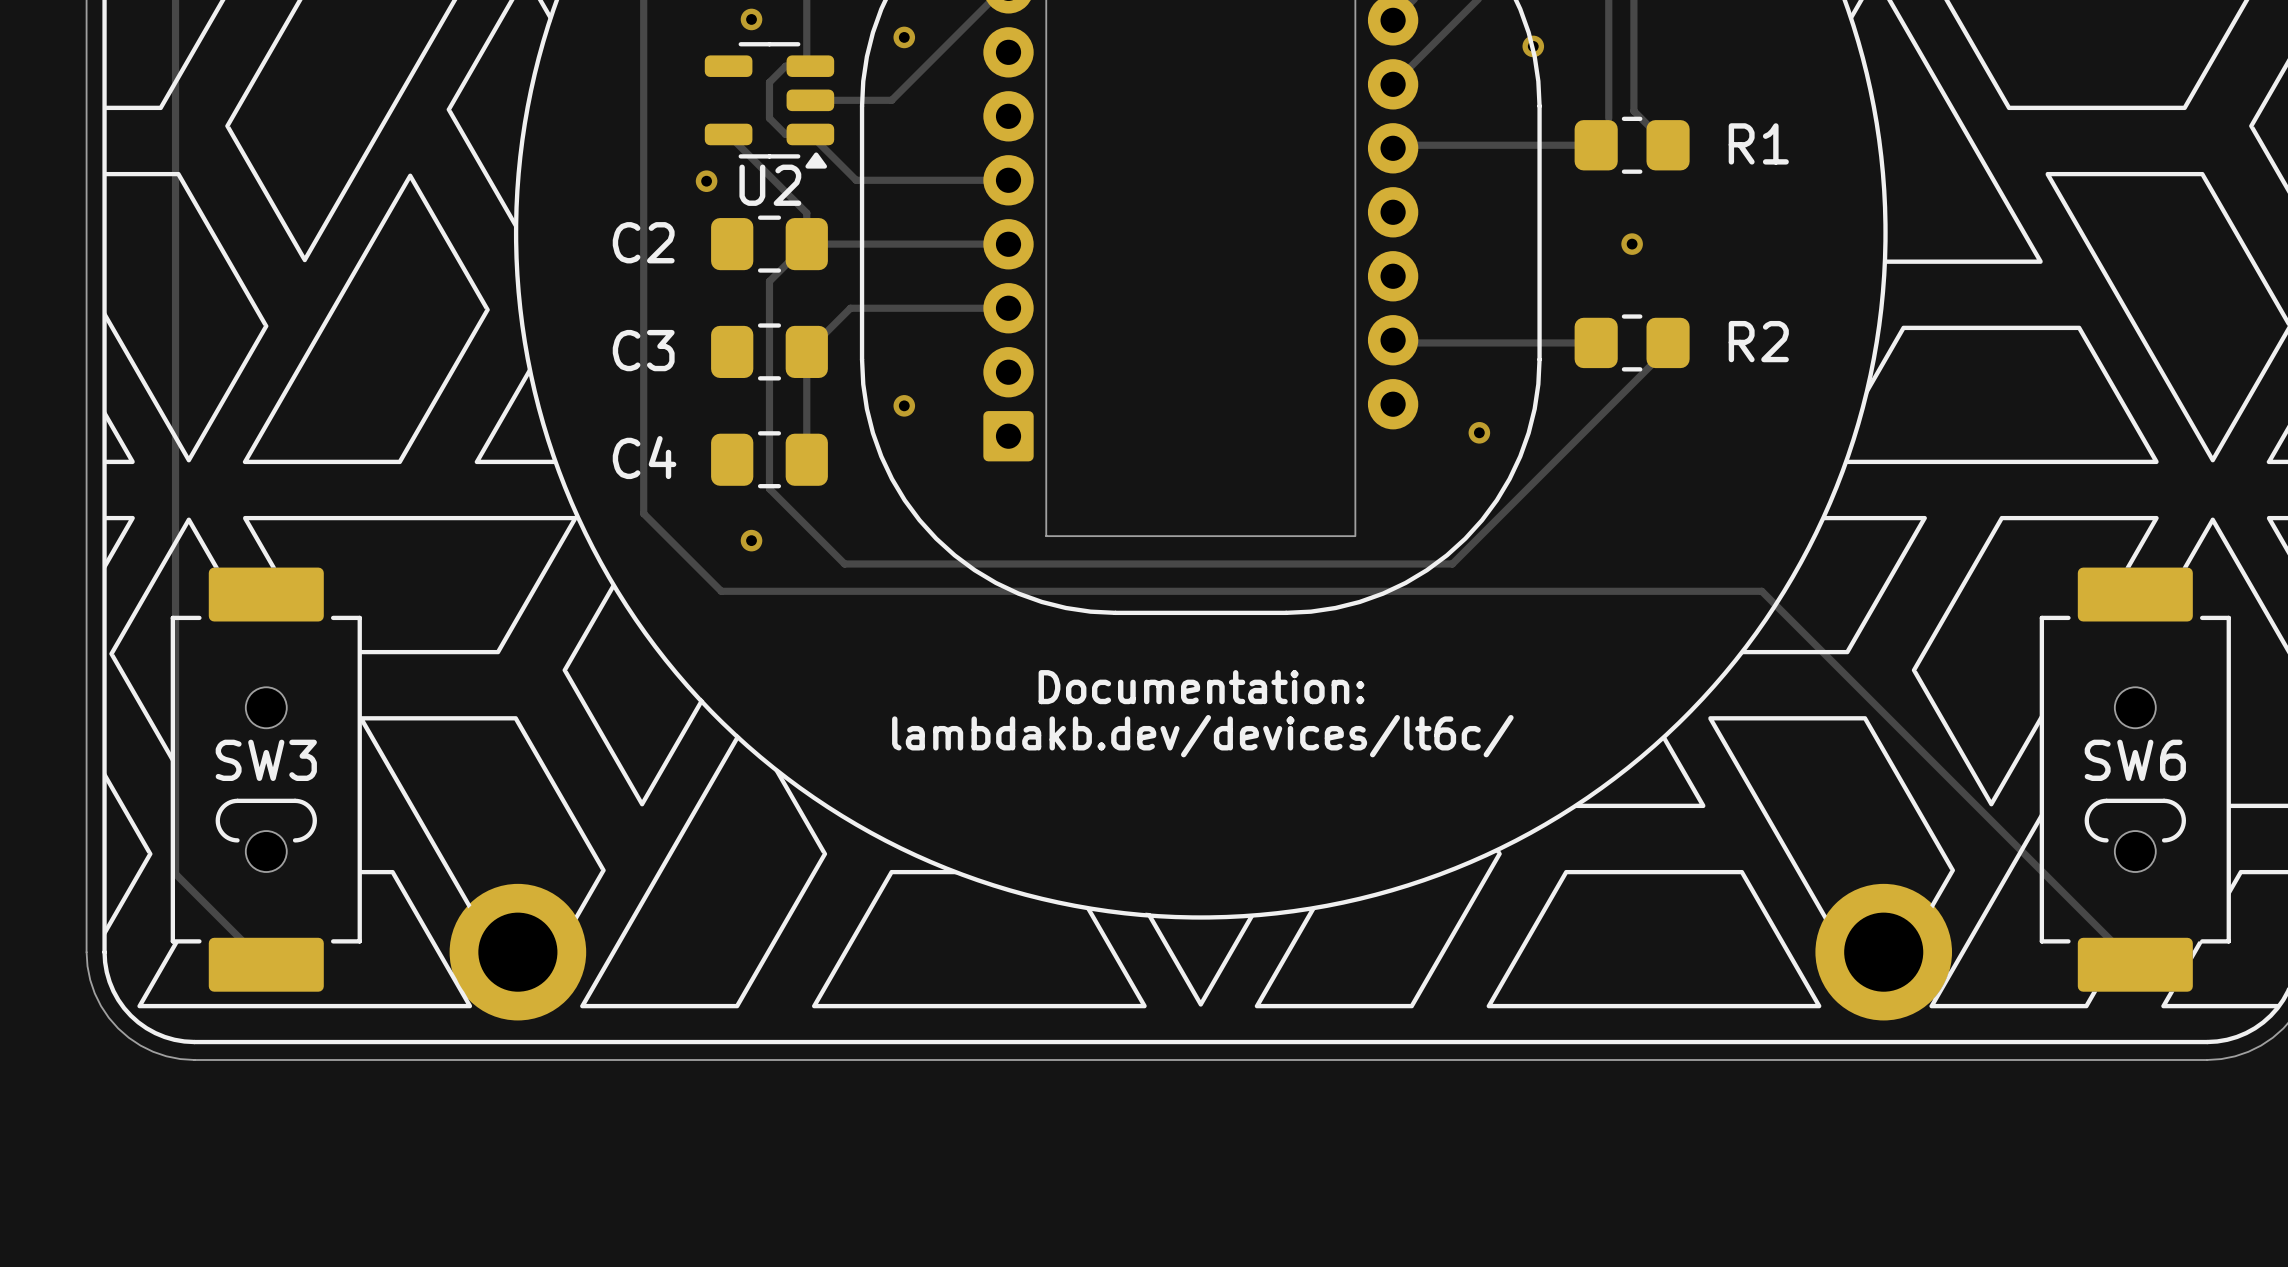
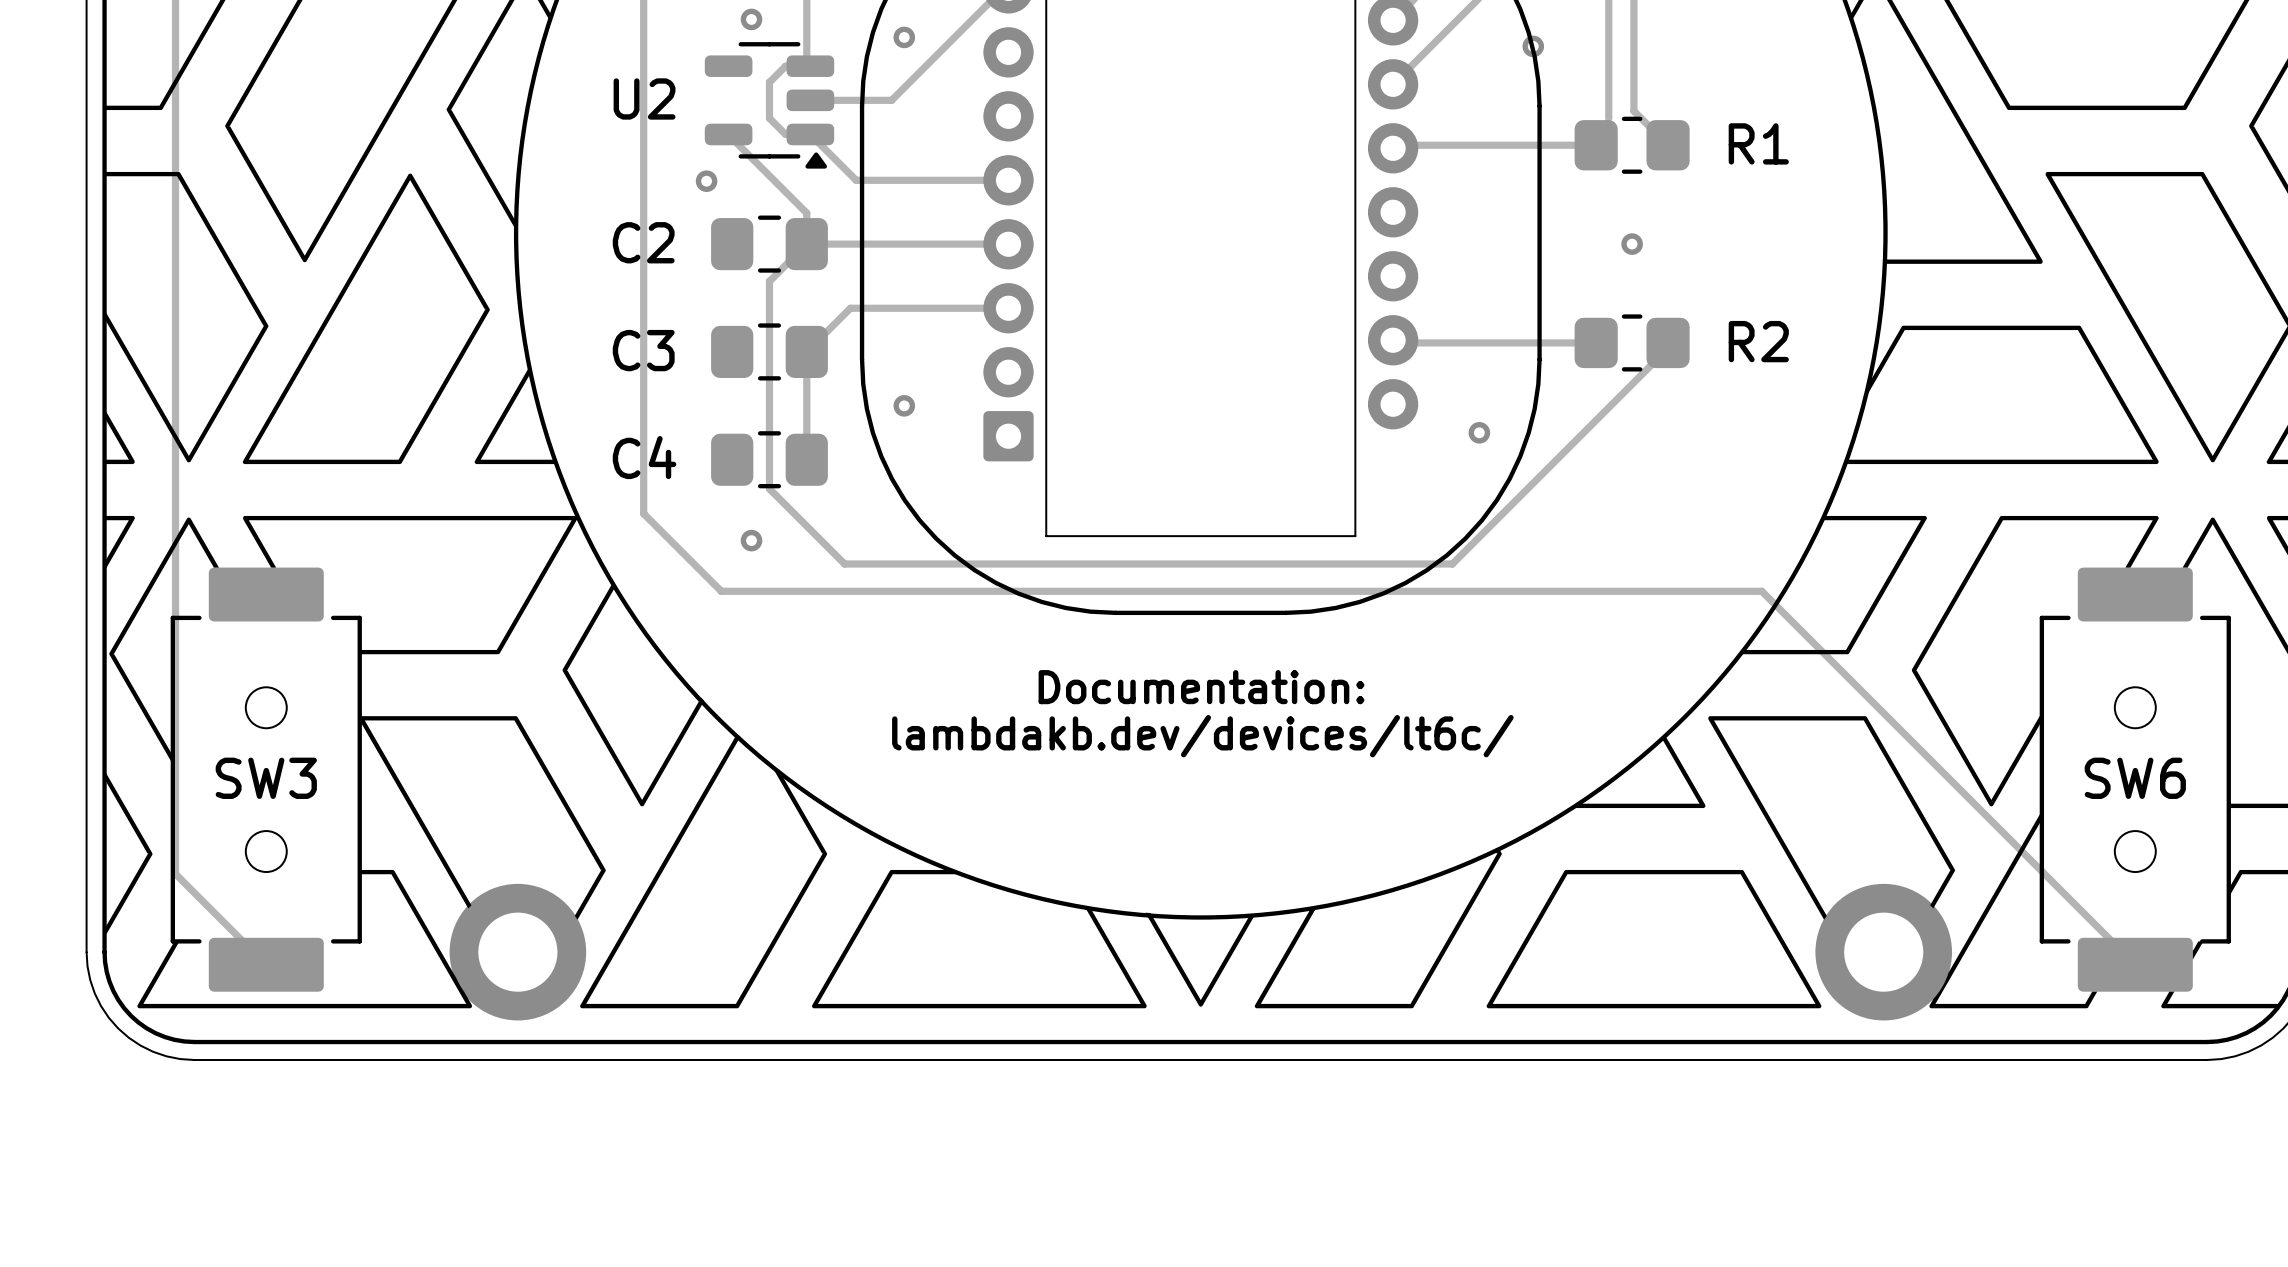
U2 name position: U2 (770, 185) -> U2 (644, 98)
SW3 footprint: [170, 567, 362, 992] -> [170, 567, 362, 992]
SW6 footprint: [2039, 567, 2231, 992] -> [2039, 567, 2231, 992]

